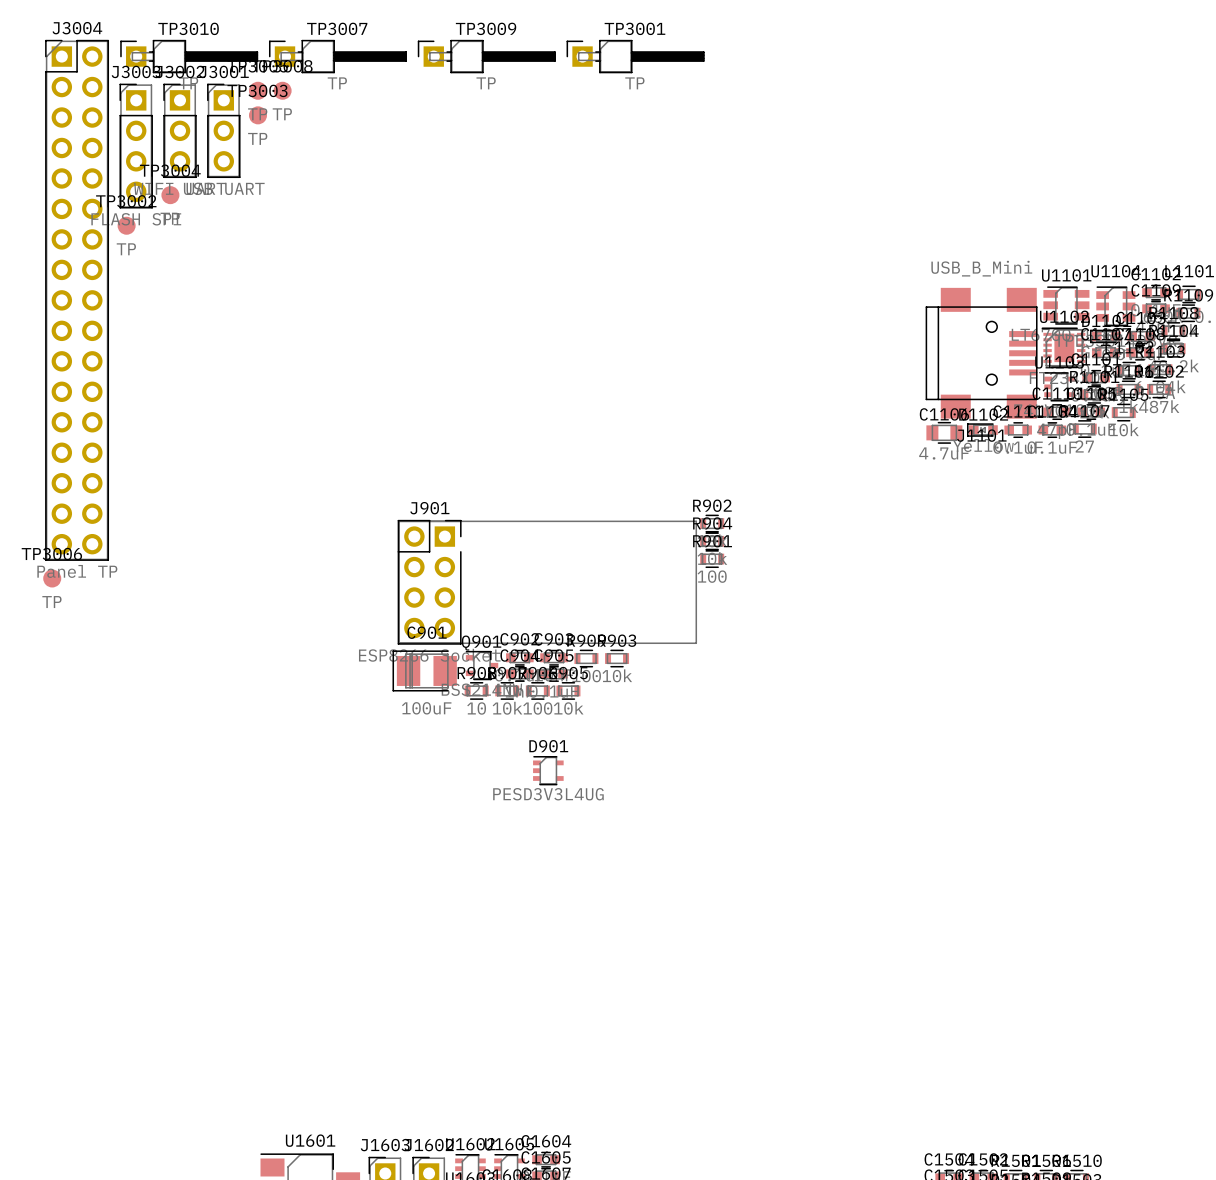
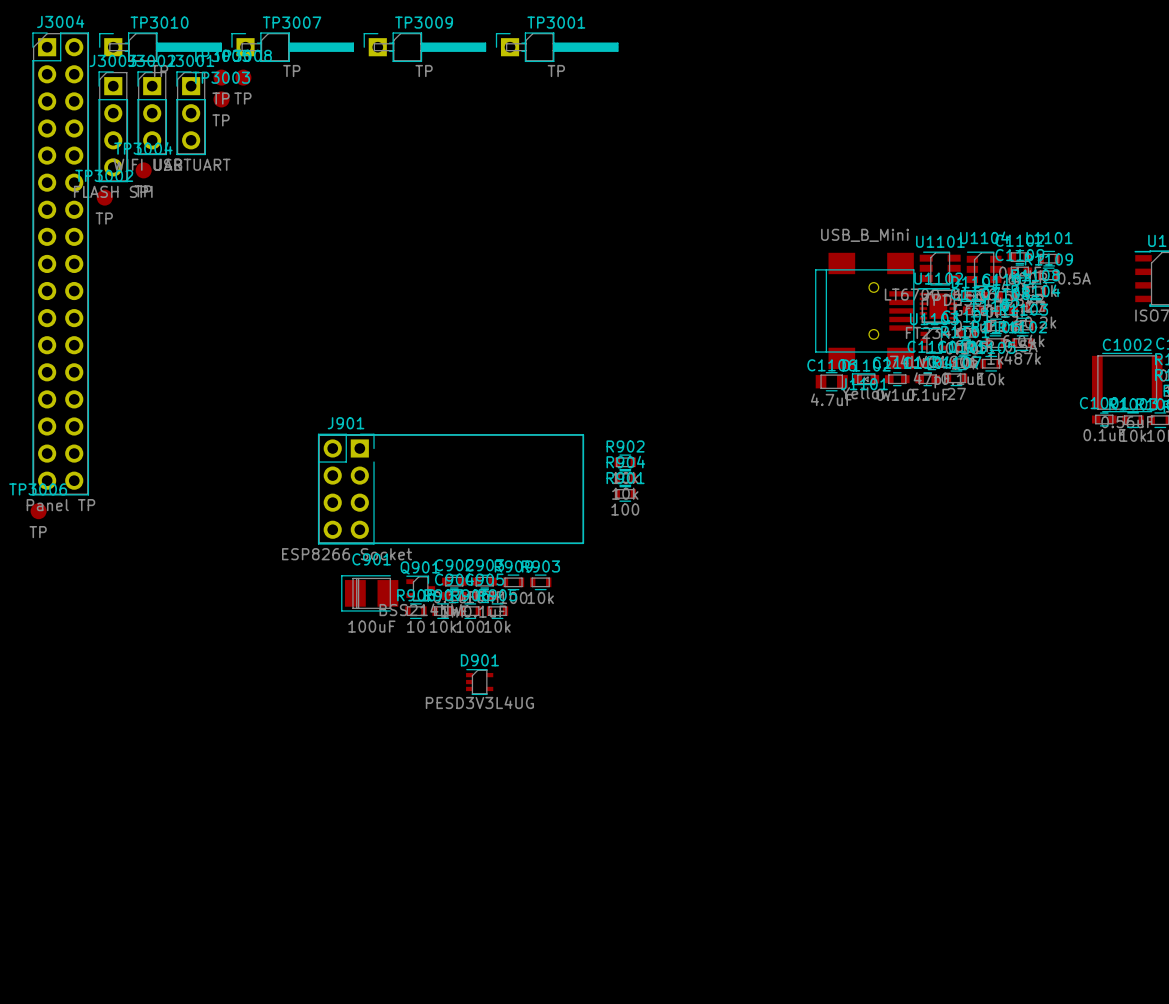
J901 footprint: [397, 519, 697, 645] -> [317, 433, 585, 545]

